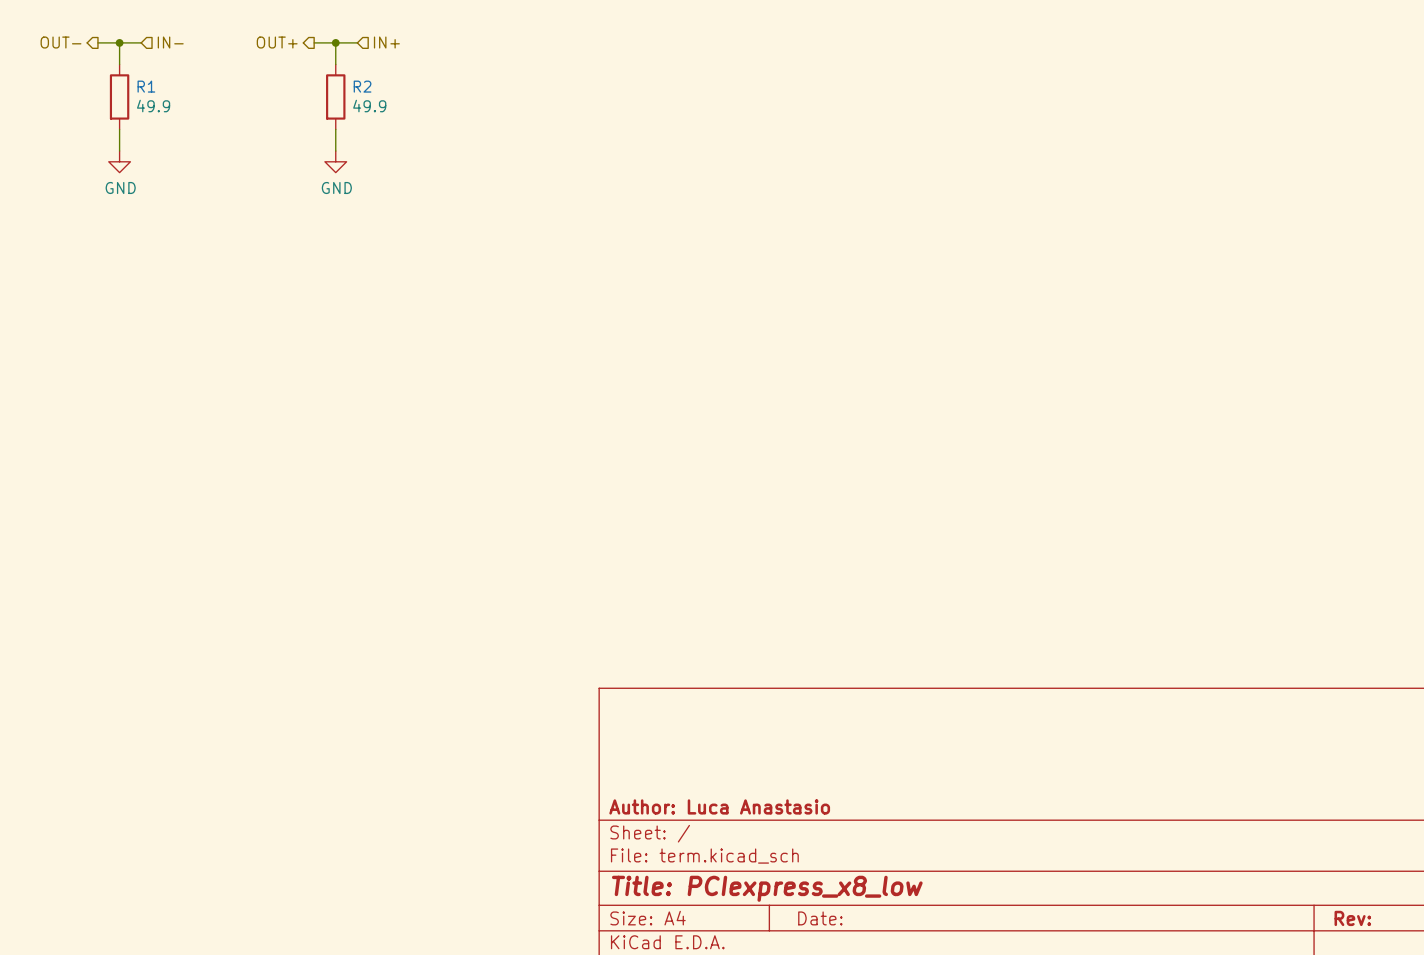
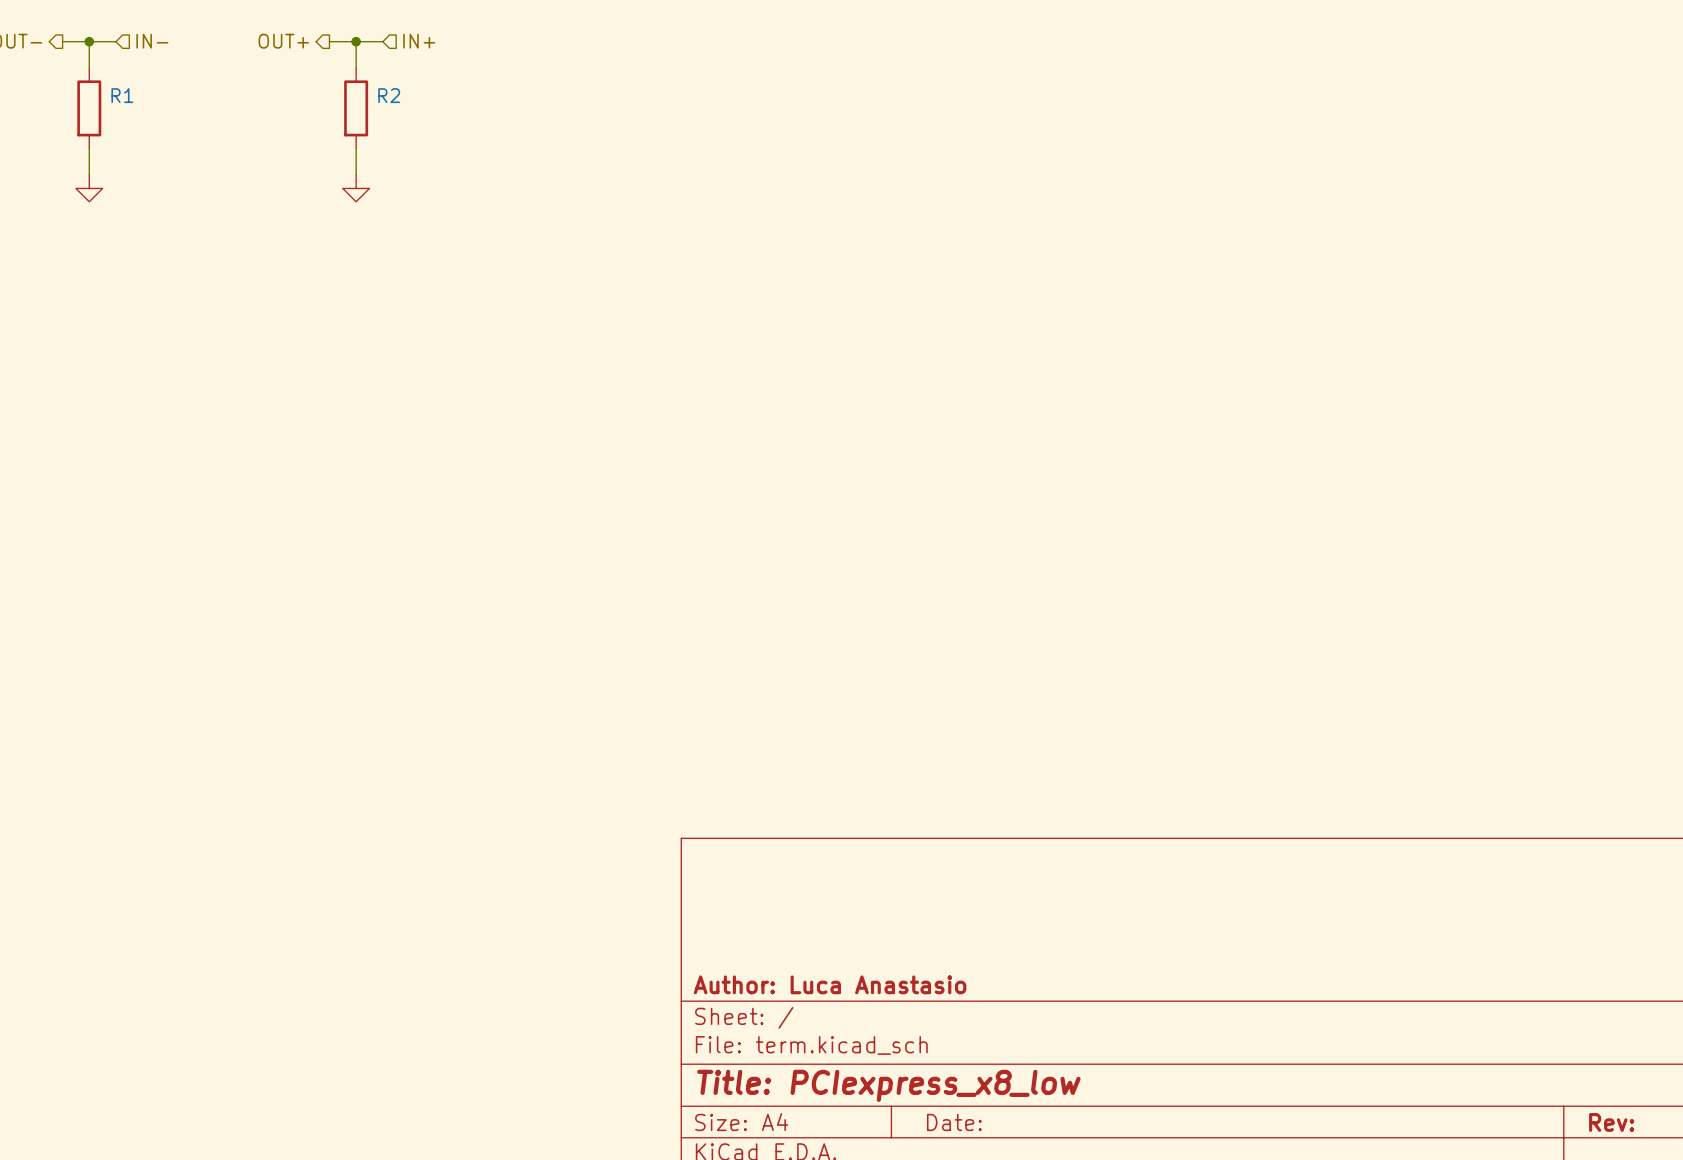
R1 value: 49.9 (153, 106) -> none
R2 value: 49.9 (369, 106) -> none
power symbol text: GND (120, 187) -> none
power symbol text: GND (336, 187) -> none

